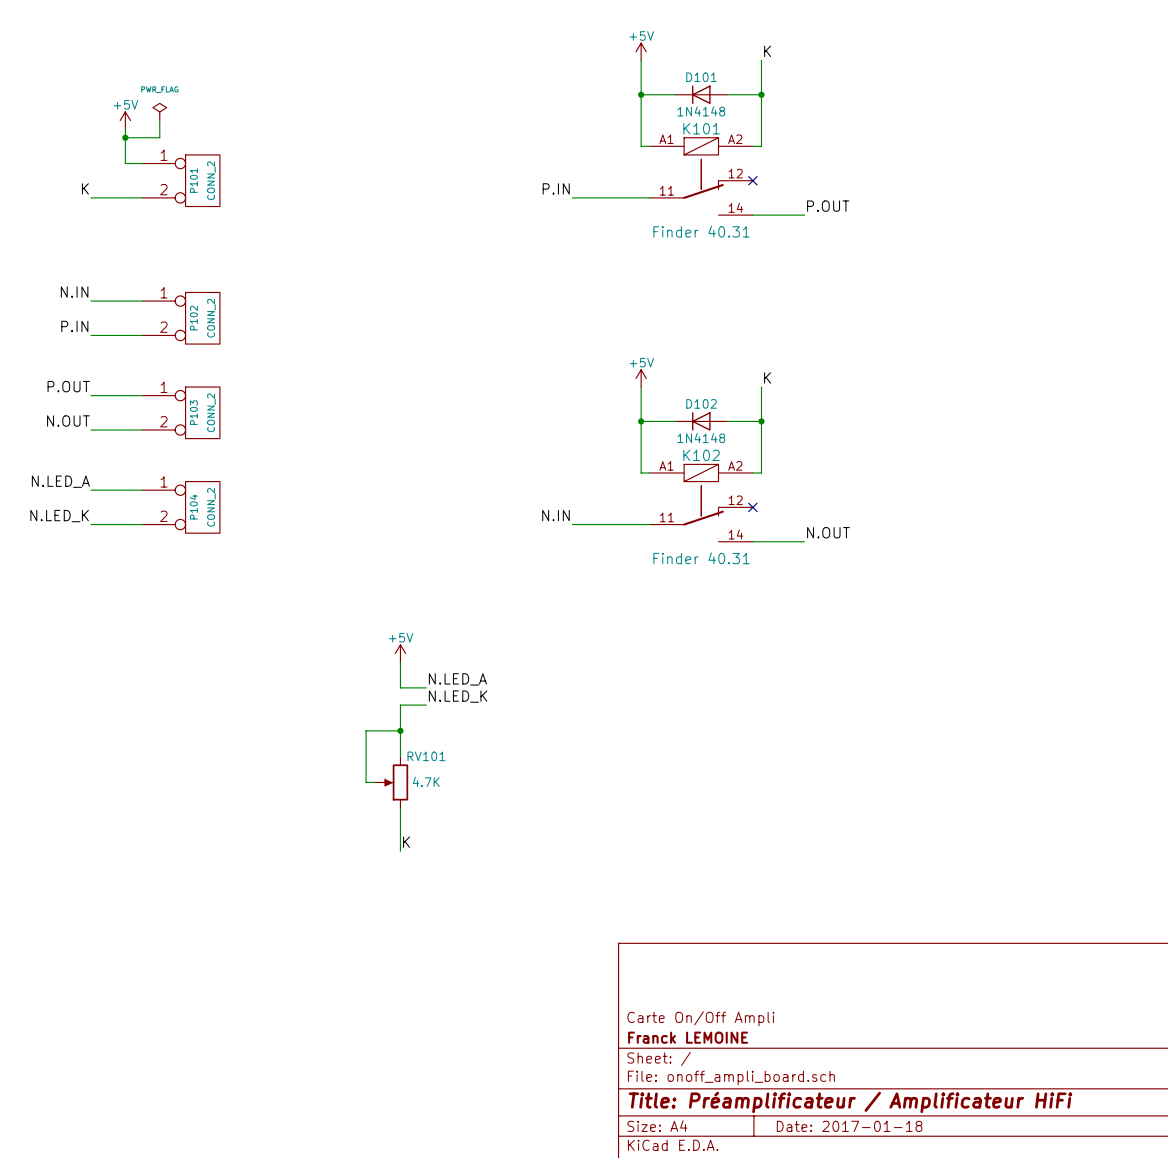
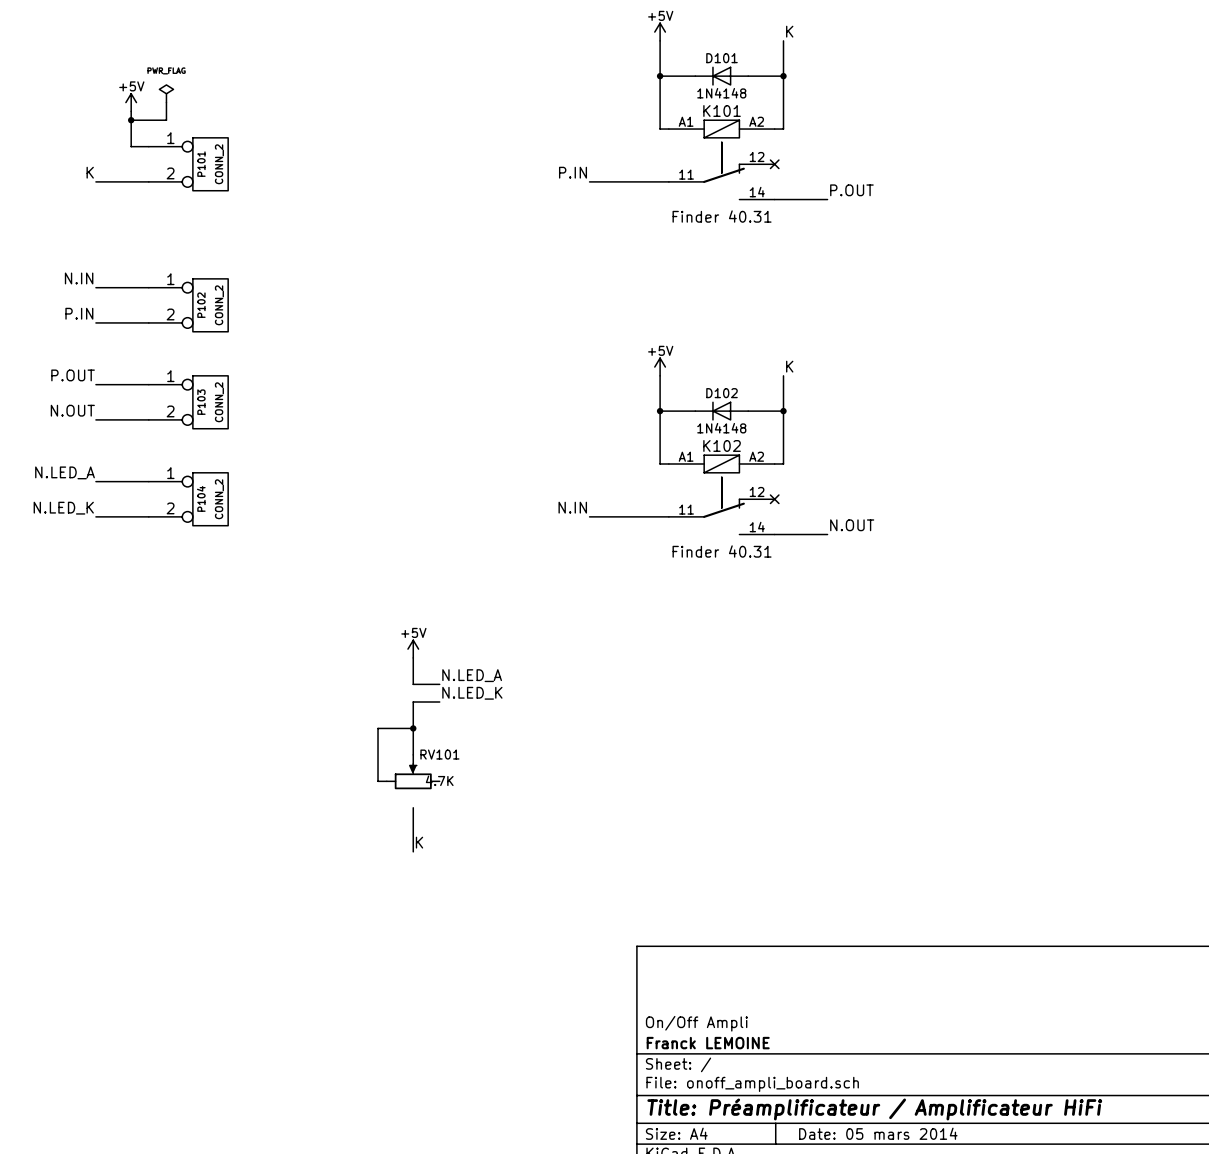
RV101 rotation: 0° (395, 782) -> 90° clockwise (413, 776)
title block: Carte On/Off Ampli (700, 1018) -> On/Off Ampli (696, 1023)
title block: Date: 2017-01-18 (849, 1126) -> Date: 05 mars 2014 (878, 1133)

